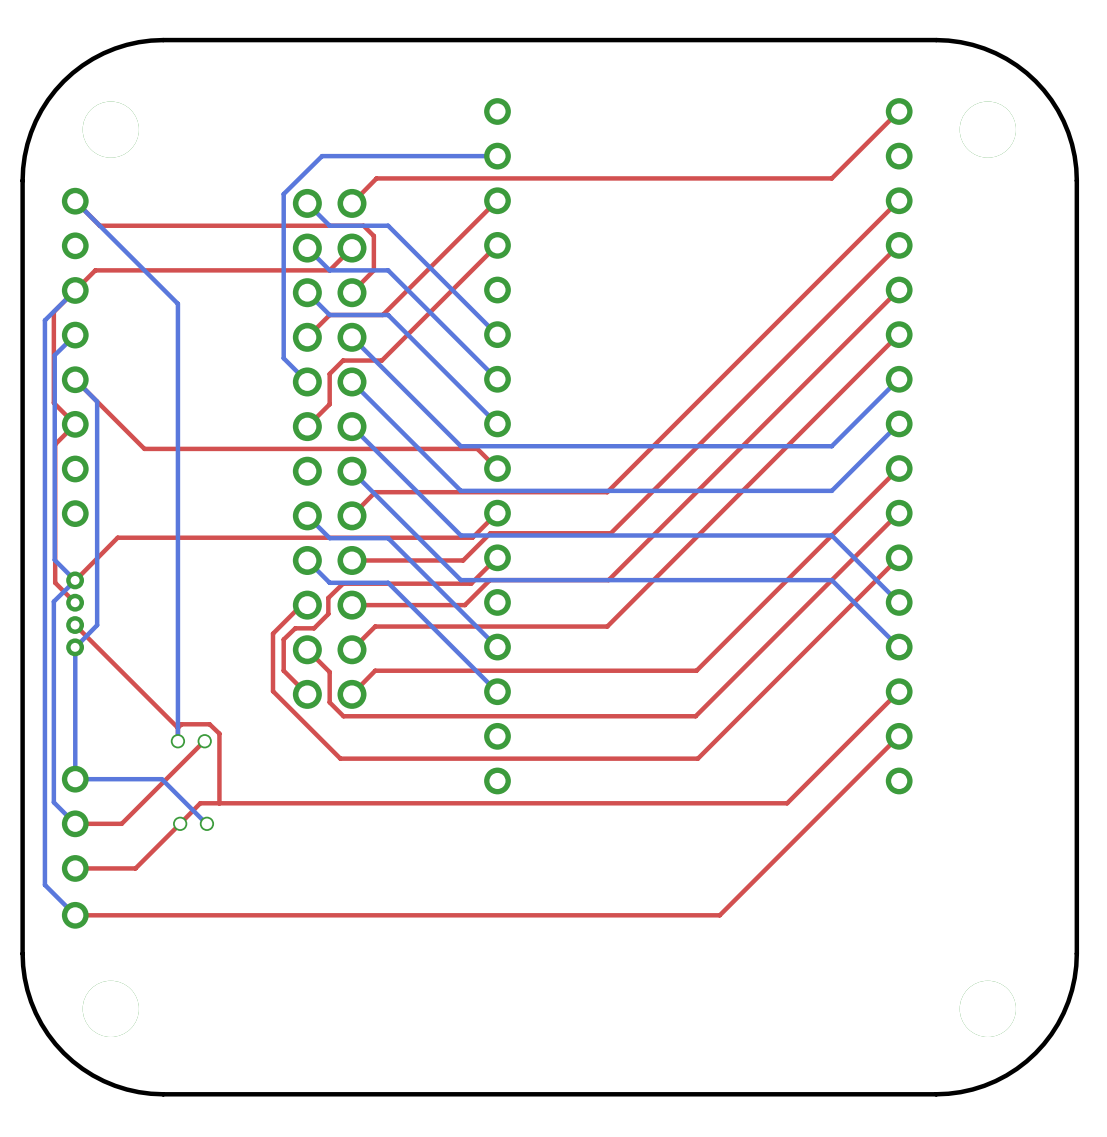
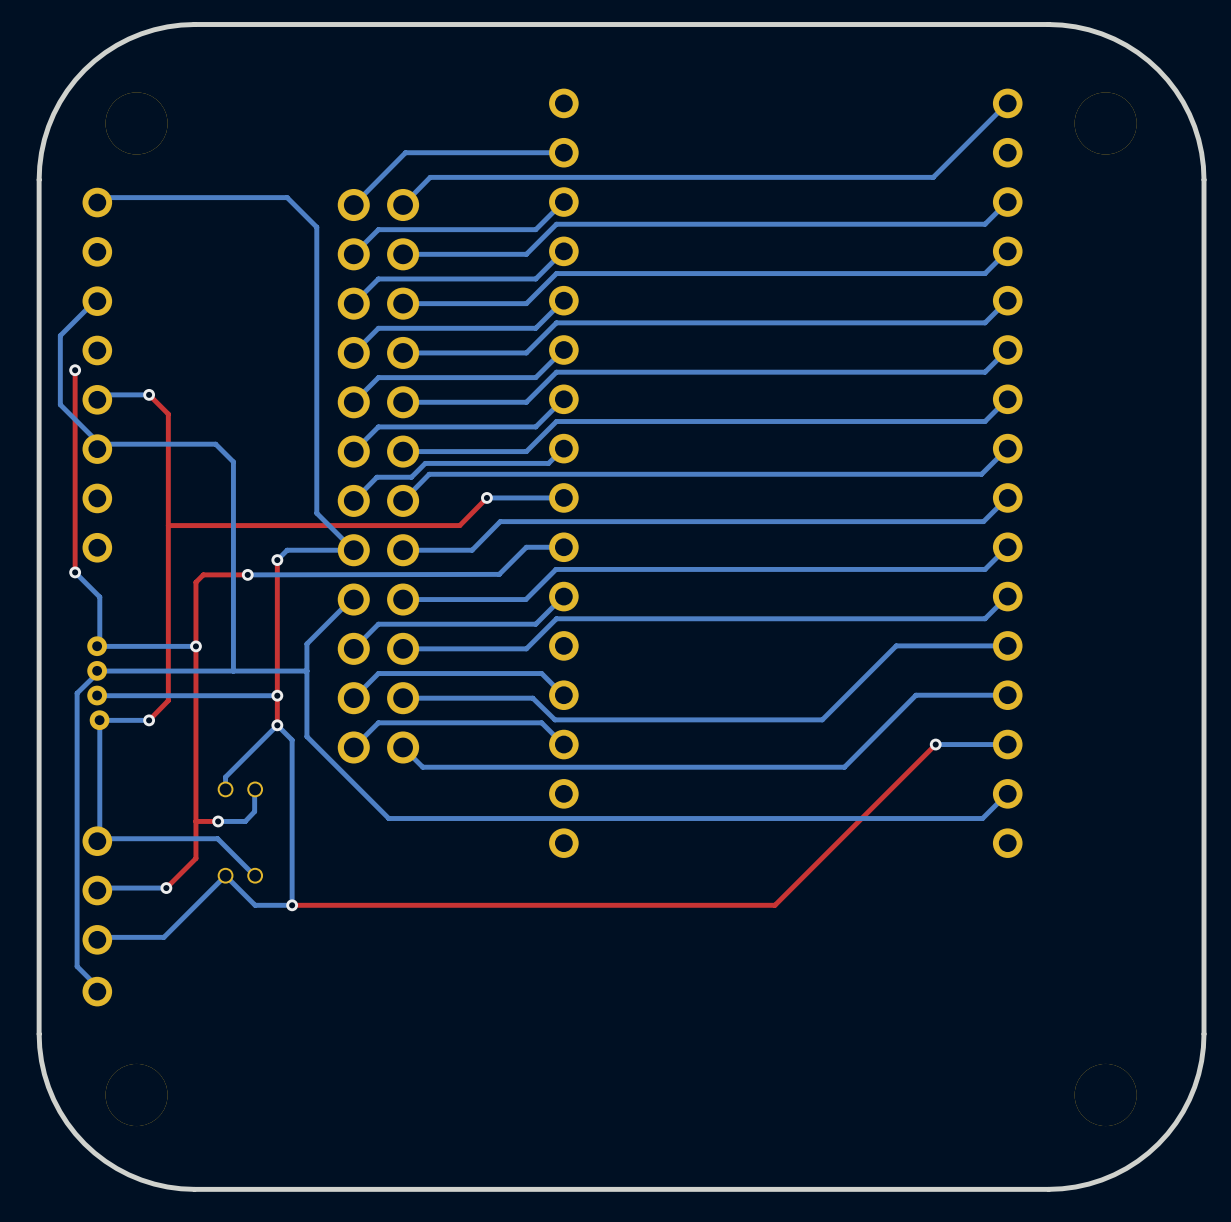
bottom track: none -> (1007, 103) (933, 177) (430, 177) (403, 205)
top track: (898, 111) (831, 178) (376, 178) (351, 203) -> none
bottom track: (354, 156) (322, 156) (283, 194) (283, 358) (307, 381) -> (405, 152) (353, 205)
bottom track: none -> (99, 197) (287, 197) (316, 227) (316, 513) (353, 550) (287, 550) (277, 560)
top track: (497, 200) (382, 315) (329, 315) (307, 337) -> none
bottom track: none -> (1007, 202) (985, 224) (556, 224) (526, 254) (403, 254)
top track: (898, 200) (607, 492) (375, 492) (351, 515) -> none
bottom track: (75, 201) (177, 303) (177, 741) -> none
top track: (75, 201) (99, 225) (363, 225) (373, 236) (373, 270) (351, 292) -> none
bottom track: (307, 203) (329, 225) -> (353, 254) (378, 229)
bottom track: (388, 225) (497, 334) -> (443, 229) (535, 229) (563, 202)
top track: (497, 245) (381, 360) (343, 360) (329, 373) (329, 404) (307, 426) -> none
bottom track: none -> (1007, 251) (985, 273) (556, 273) (526, 303) (403, 303)
top track: (898, 245) (610, 533) (490, 533) (463, 560) (351, 560) -> none
bottom track: (307, 248) (329, 270) -> none
top track: (351, 248) (329, 270) (95, 270) (53, 311) (53, 402) (75, 424) (55, 444) -> (75, 370) (75, 471)
bottom track: (388, 270) (497, 379) -> (443, 278) (535, 278) (563, 251)
bottom track: none -> (99, 296) (60, 335) (60, 404) (99, 444) (215, 444) (233, 461) (233, 671)
bottom track: (75, 290) (44, 320) (44, 884) (75, 915) -> none
bottom track: none -> (1007, 300) (985, 322) (556, 322) (526, 352) (403, 352)
top track: (898, 290) (608, 580) (489, 580) (464, 605) (351, 605) -> none
bottom track: (307, 292) (329, 315) -> (353, 303) (378, 278)
bottom track: none -> (378, 328) (353, 352)
bottom track: (388, 315) (497, 423) -> (443, 328) (535, 328) (563, 300)
bottom track: none -> (563, 349) (535, 377) (378, 377) (353, 402)
bottom track: none -> (1007, 349) (985, 372) (556, 372) (526, 402) (403, 402)
top track: (898, 334) (607, 626) (375, 626) (351, 649) -> none
bottom track: (75, 335) (54, 355) (54, 560) (75, 580) (53, 601) (53, 802) (75, 823) -> none
bottom track: (351, 337) (460, 446) (831, 446) (878, 399) -> (403, 451) (526, 451) (556, 421) (985, 421)
via: none -> (75, 370)
bottom track: none -> (149, 394) (99, 394)
top track: none -> (149, 394) (168, 414) (168, 700) (149, 720)
via: none -> (149, 394)
bottom track: (75, 379) (97, 401) (97, 625) (75, 647) (75, 779) (161, 779) (206, 823) -> none
top track: (75, 379) (144, 448) (477, 448) (497, 468) -> none
bottom track: none -> (563, 399) (535, 426) (378, 426) (353, 451)
bottom track: (351, 381) (460, 490) (831, 490) (875, 447) -> (403, 500) (429, 474) (981, 474)
bottom track: none -> (563, 448) (548, 463) (425, 463) (411, 477) (376, 477) (353, 500)
bottom track: (351, 426) (460, 535) (831, 535) (898, 602) -> (403, 698) (532, 698) (554, 719) (822, 719) (896, 645) (1007, 645)
top track: none -> (486, 497) (459, 525) (168, 525)
via: none -> (486, 497)
bottom track: none -> (563, 497) (486, 497)
bottom track: none -> (1007, 497) (983, 521) (500, 521) (472, 550) (403, 550)
top track: (898, 468) (696, 670) (375, 670) (351, 694) -> none
bottom track: (351, 471) (460, 580) (831, 580) (898, 647) -> (403, 747) (422, 767) (844, 767) (915, 695) (1007, 695)
bottom track: none -> (563, 547) (526, 547) (499, 574) (247, 574)
top track: (497, 513) (472, 537) (117, 537) (75, 580) -> none
bottom track: none -> (1007, 547) (985, 569) (555, 569) (525, 599) (403, 599)
top track: (898, 513) (695, 716) (343, 716) (329, 702) (329, 672) (307, 649) -> none
bottom track: (307, 515) (329, 538) (388, 538) (477, 627) -> (353, 698) (378, 673) (541, 673)
top track: none -> (277, 560) (277, 725)
via: none -> (277, 560)
bottom track: none -> (75, 572) (99, 597) (99, 646) (195, 646)
top track: (55, 535) (55, 582) (75, 602) -> none
via: none -> (75, 572)
top track: none -> (247, 574) (203, 574) (195, 582) (195, 858) (166, 888)
via: none -> (247, 574)
top track: (497, 557) (471, 583) (343, 583) (328, 597) (328, 614) (314, 628) (295, 628) (283, 639) (283, 670) (307, 694) -> none
bottom track: none -> (1007, 596) (985, 618) (556, 618) (526, 648) (403, 648)
top track: (898, 557) (697, 758) (340, 758) (272, 691) (272, 633) (301, 605) (307, 605) -> none
bottom track: (307, 560) (329, 582) -> (353, 648) (378, 624)
bottom track: none -> (353, 599) (351, 599) (306, 643) (306, 736) (388, 818) (982, 818) (1007, 793)
part position: (75, 580) -> (99, 720)
bottom track: (388, 582) (477, 672) -> (443, 624) (535, 624) (563, 596)
via: none -> (195, 646)
top track: (75, 625) (177, 727) -> none
bottom track: none -> (306, 671) (99, 671) (77, 693) (77, 966) (99, 989)
bottom track: none -> (277, 695) (99, 695)
via: none -> (277, 695)
bottom track: none -> (149, 720) (99, 720) (99, 838) (217, 838) (254, 875)
via: none -> (149, 720)
bottom track: none -> (541, 722) (378, 722) (353, 747)
via: none -> (277, 725)
top track: none -> (935, 744) (774, 905) (292, 905)
via: none -> (935, 744)
bottom track: none -> (1007, 744) (935, 744)
top track: (898, 691) (787, 803) (200, 803) (135, 868) (75, 868) -> none
top track: (177, 727) (181, 724) (209, 724) (219, 733) (219, 803) -> none
bottom track: none -> (225, 789) (225, 777) (277, 725) (292, 740) (292, 905) (255, 905) (225, 875) (163, 937) (99, 937)
bottom track: none -> (254, 789) (254, 811) (245, 821) (218, 821)
top track: (898, 736) (719, 915) (75, 915) -> none
part position: (191, 741) -> (240, 789)
top track: (204, 741) (121, 823) (75, 823) -> none
top track: none -> (218, 821) (195, 821)
via: none -> (218, 821)
bottom track: none -> (166, 888) (99, 888)
via: none -> (166, 888)
part position: (193, 823) -> (240, 875)
via: none -> (292, 905)

